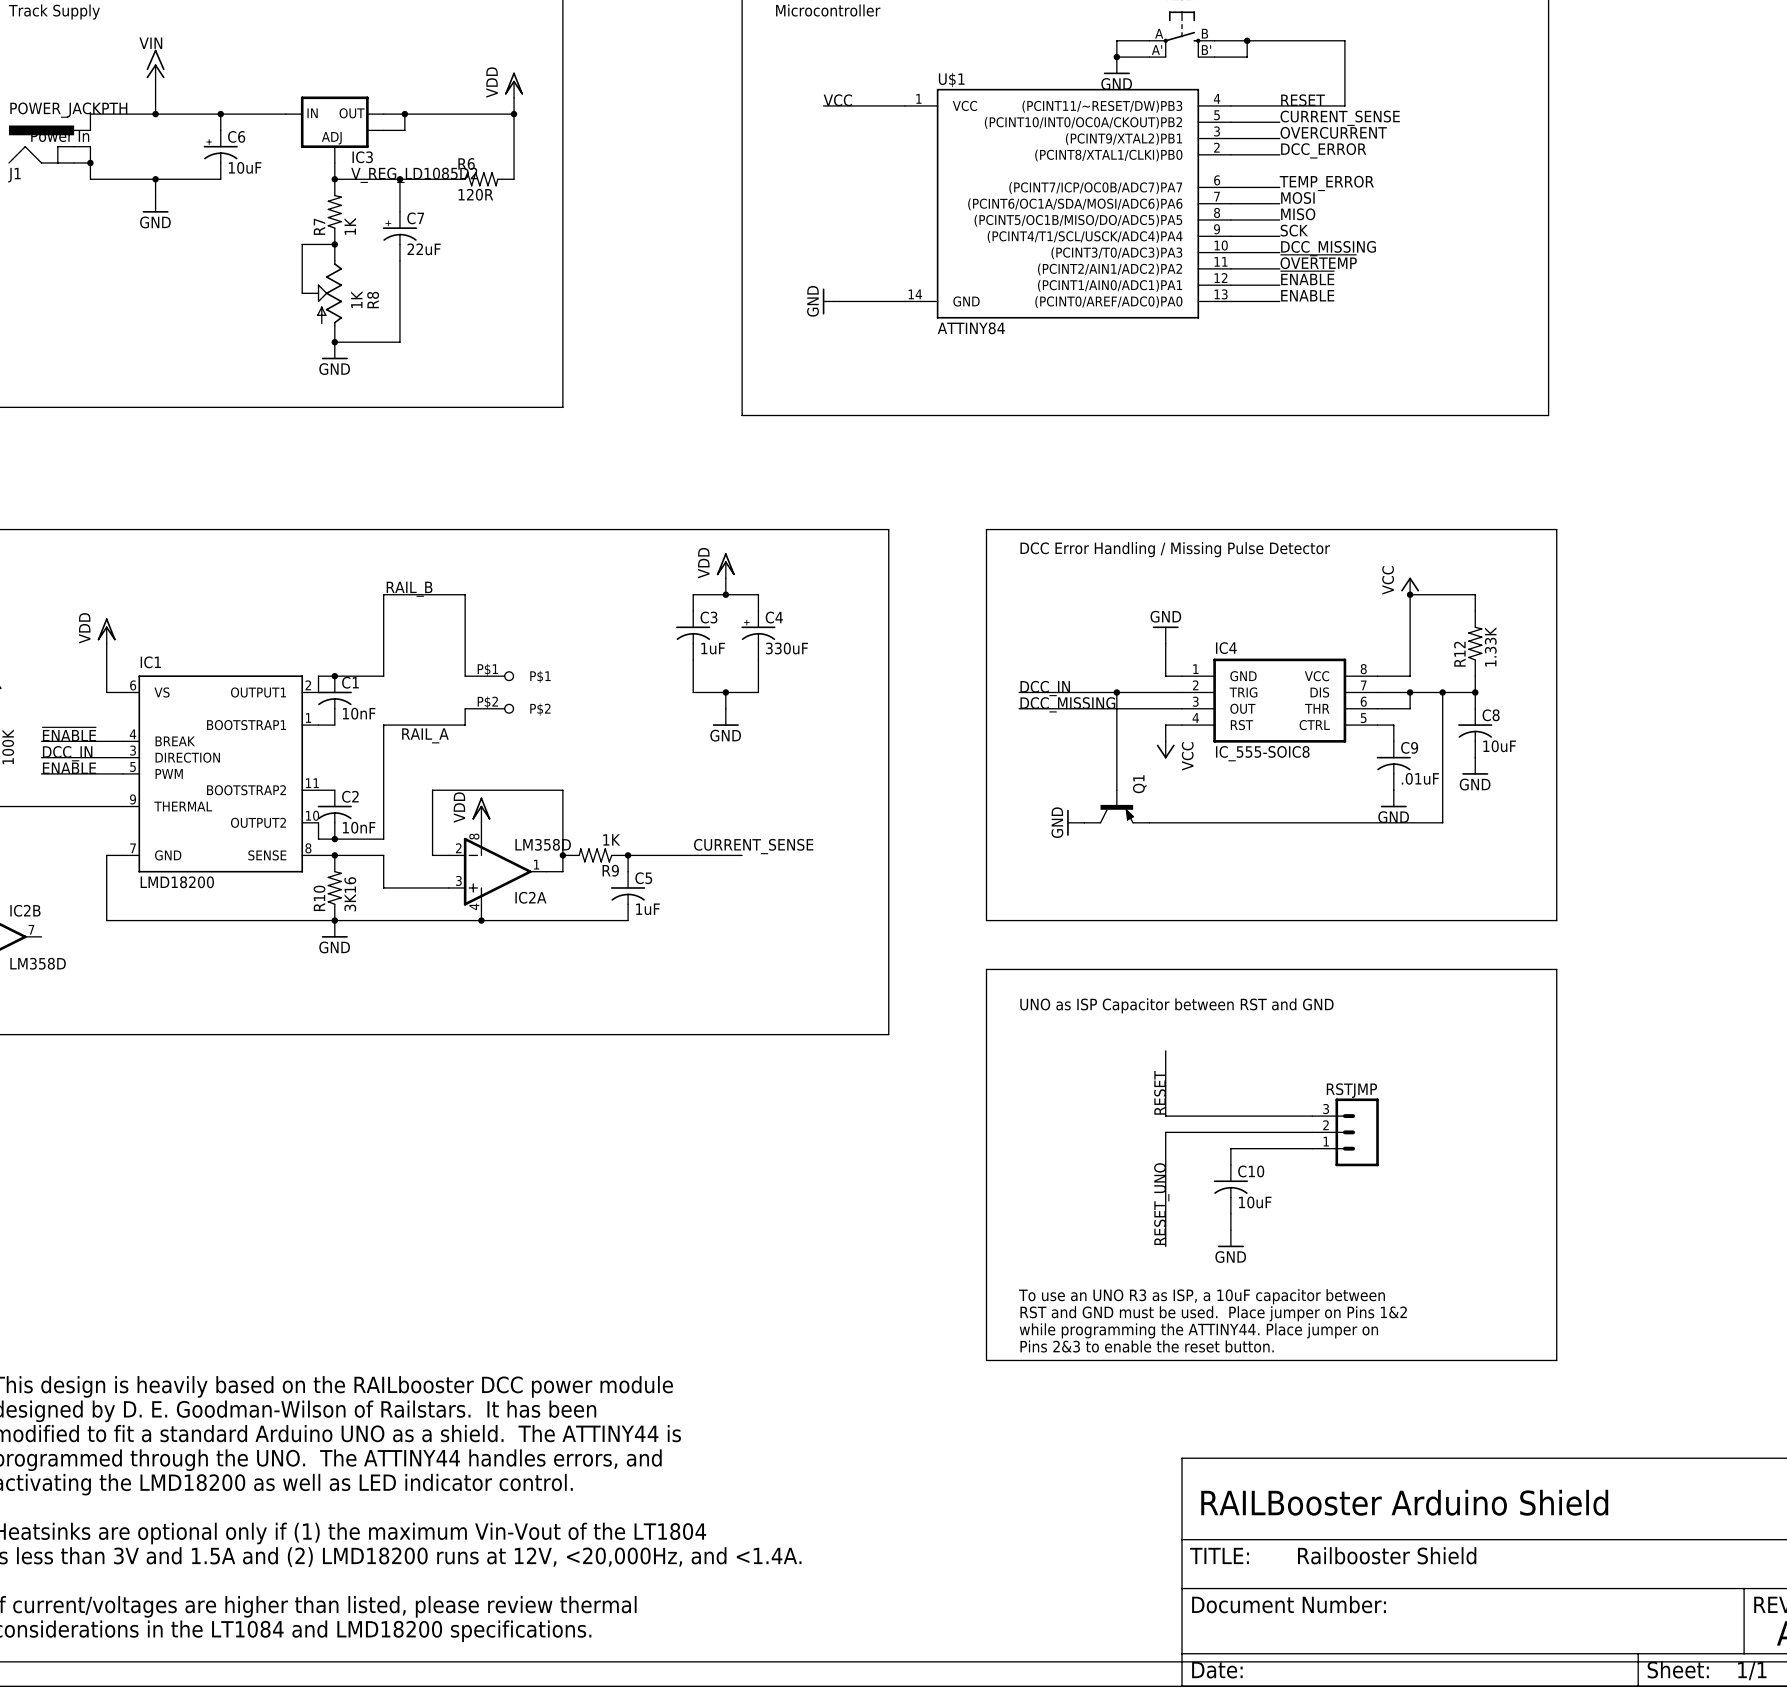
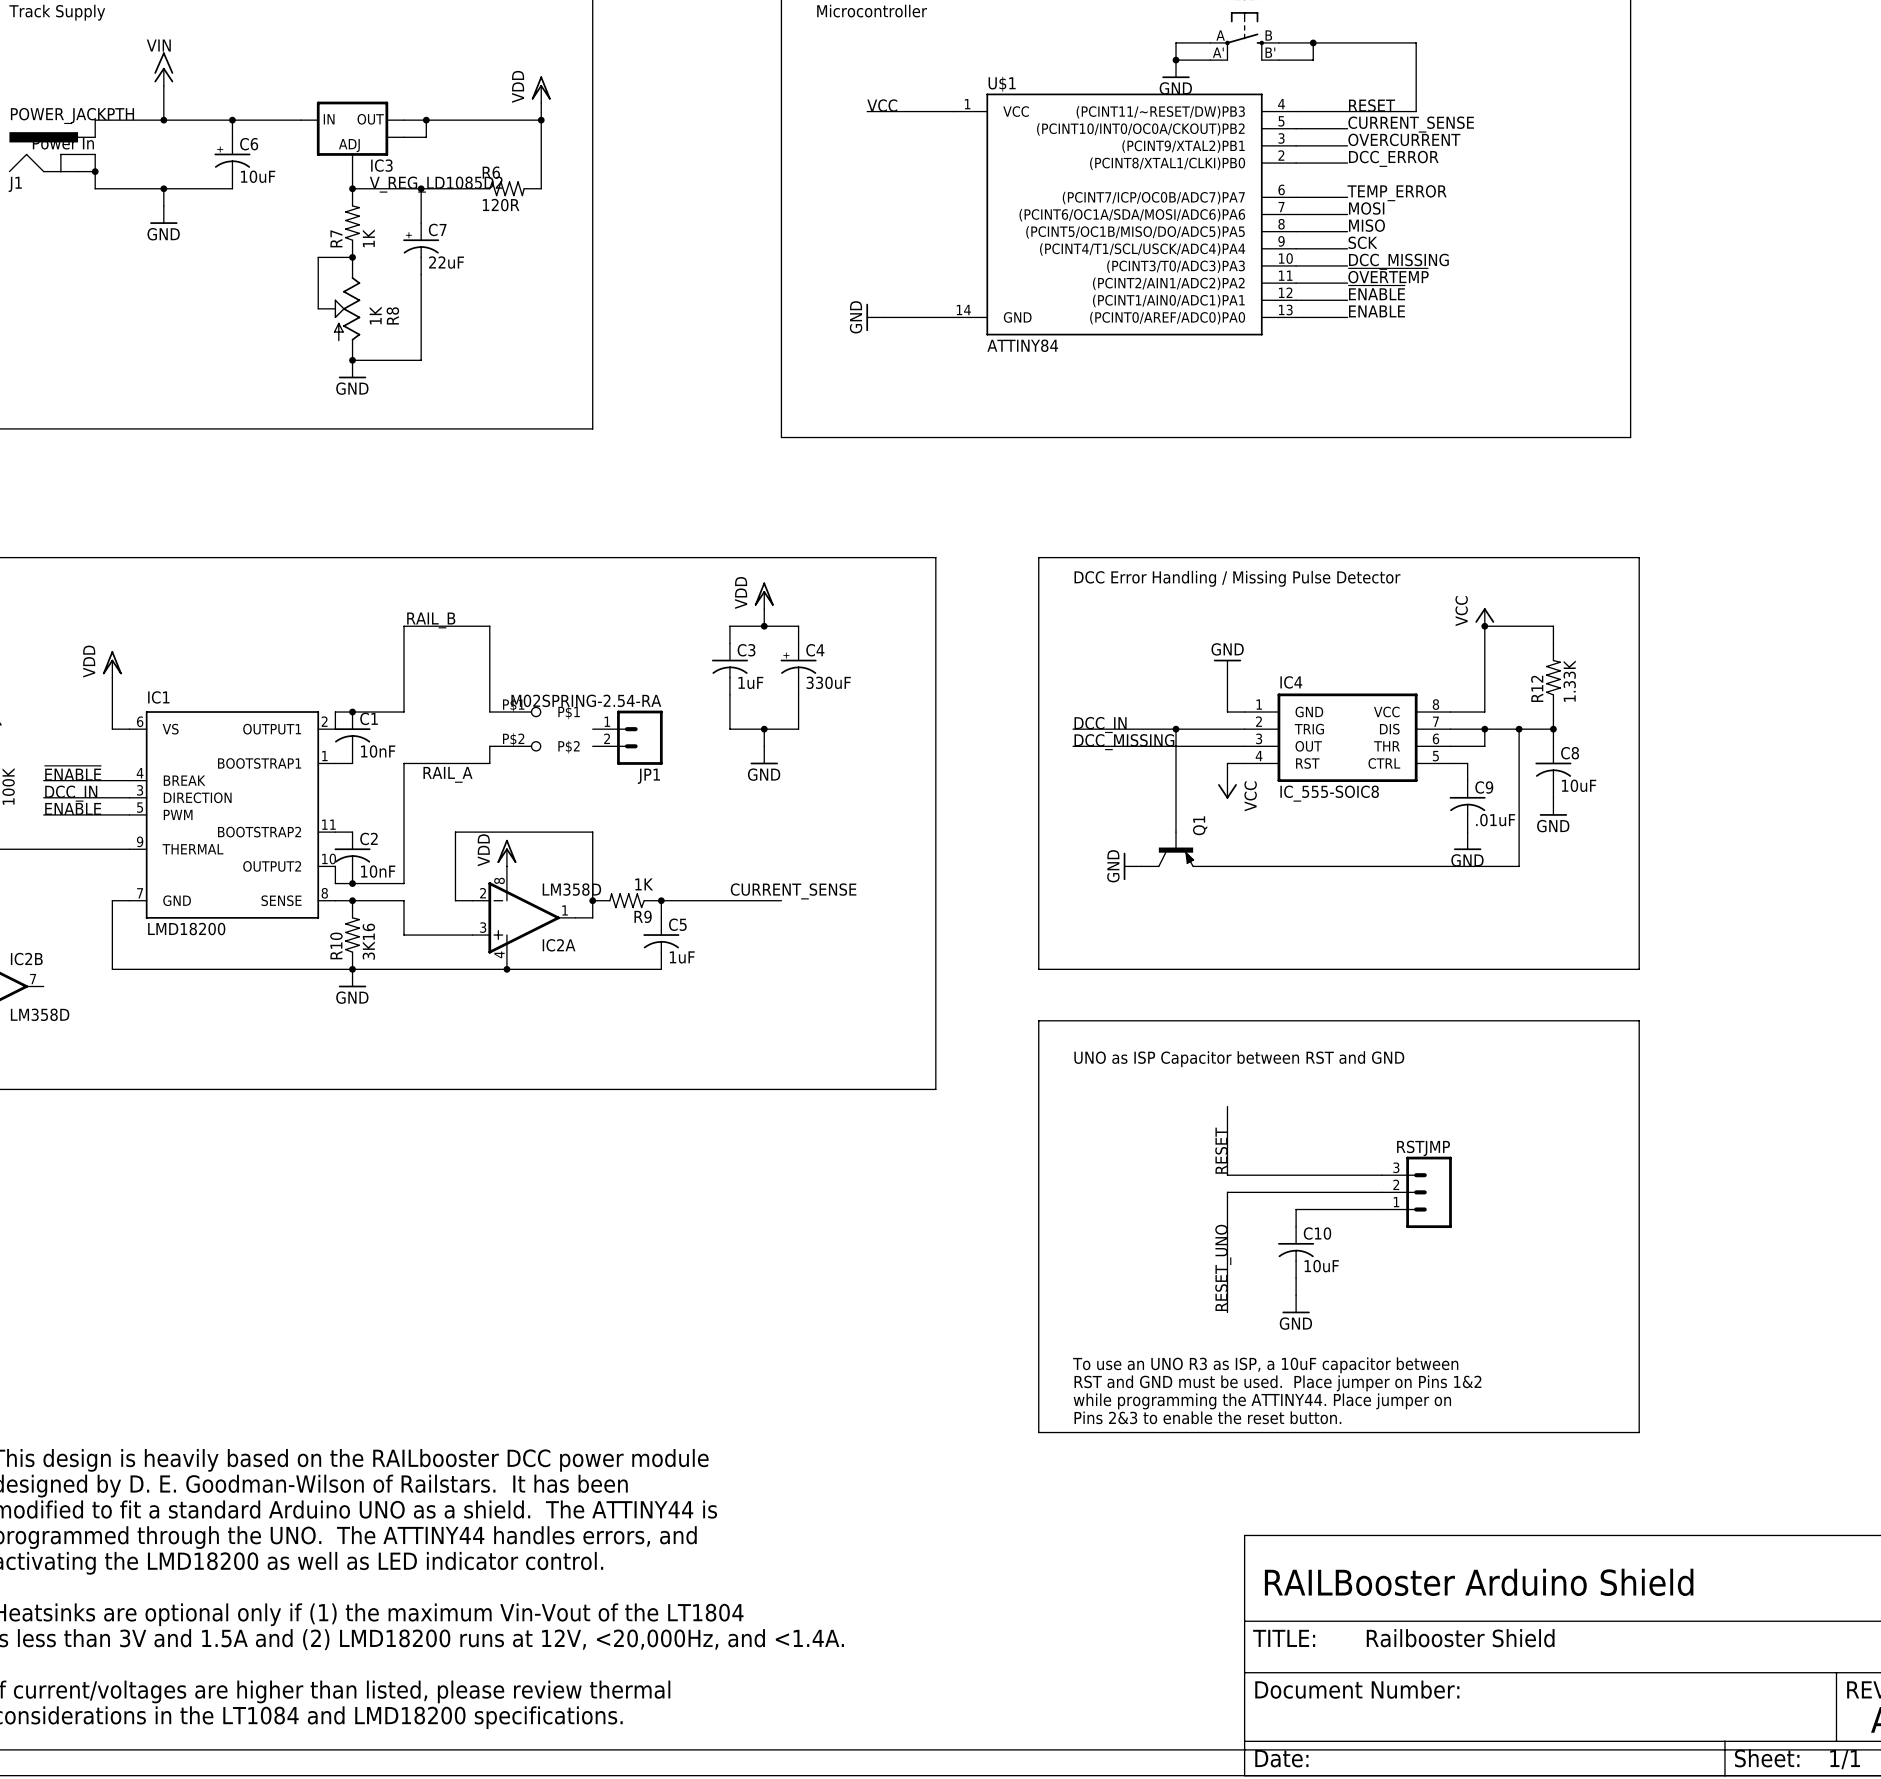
JP1: none -> M02SPRING-2.54-RA (627, 737)

